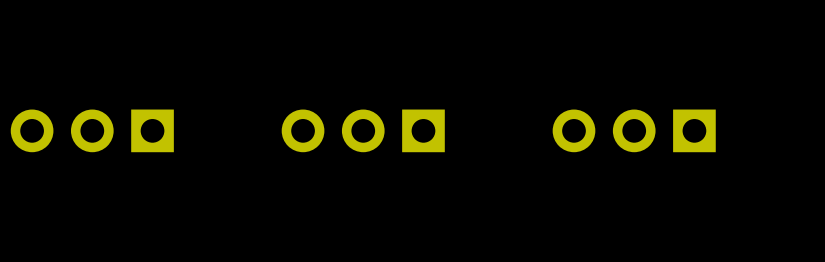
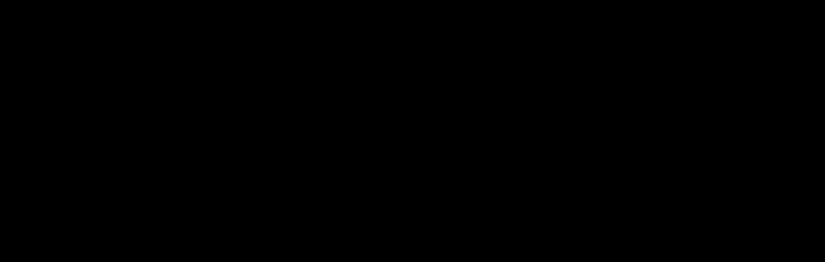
part: (92, 130) -> none
part: (363, 130) -> none
part: (634, 130) -> none

